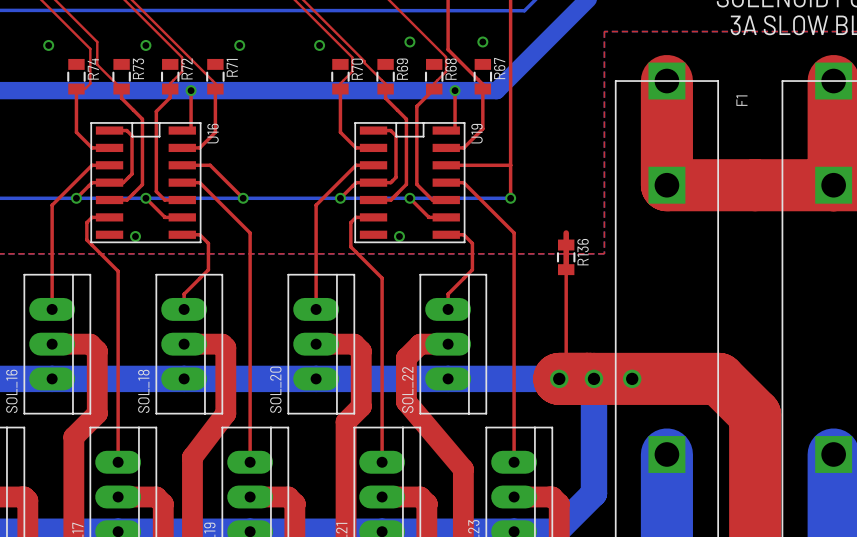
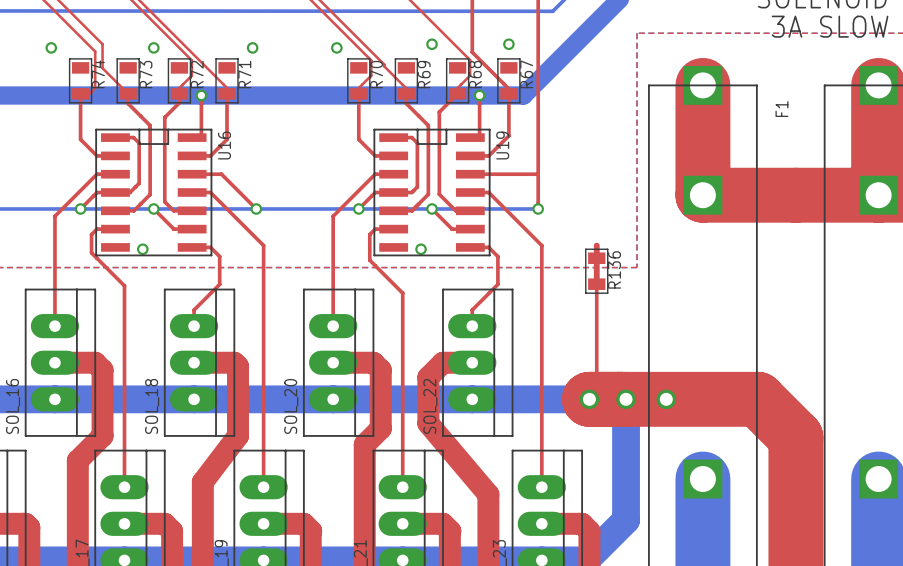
R74 footprint: [67, 58, 86, 95] -> [69, 58, 92, 104]
R73 footprint: [112, 58, 131, 95] -> [116, 58, 140, 104]
R72 footprint: [160, 58, 180, 95] -> [168, 58, 191, 104]
R71 footprint: [206, 58, 225, 95] -> [215, 58, 239, 104]
R70 footprint: [331, 58, 350, 95] -> [347, 58, 371, 104]
R69 footprint: [376, 58, 395, 95] -> [395, 58, 418, 104]
R68 footprint: [424, 58, 444, 95] -> [446, 58, 469, 104]
R67 footprint: [473, 58, 493, 95] -> [497, 58, 521, 104]
R136 footprint: [556, 239, 576, 276] -> [585, 248, 609, 294]

